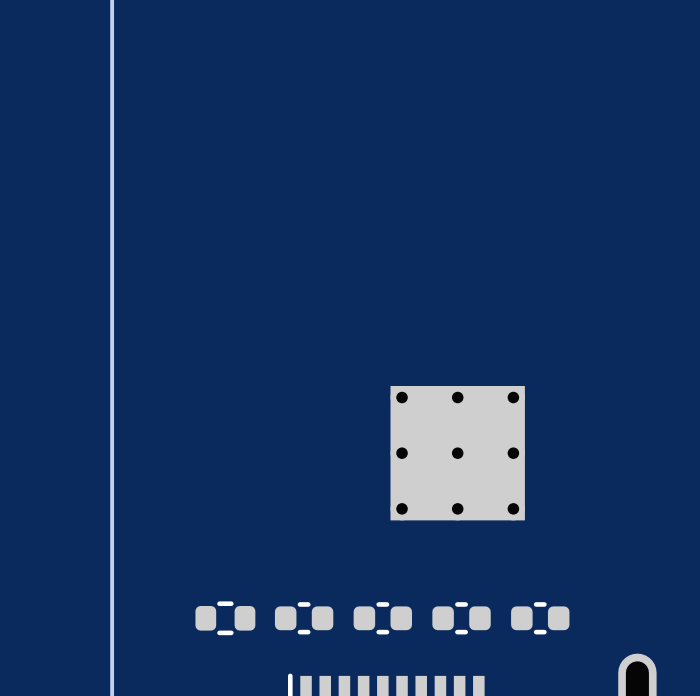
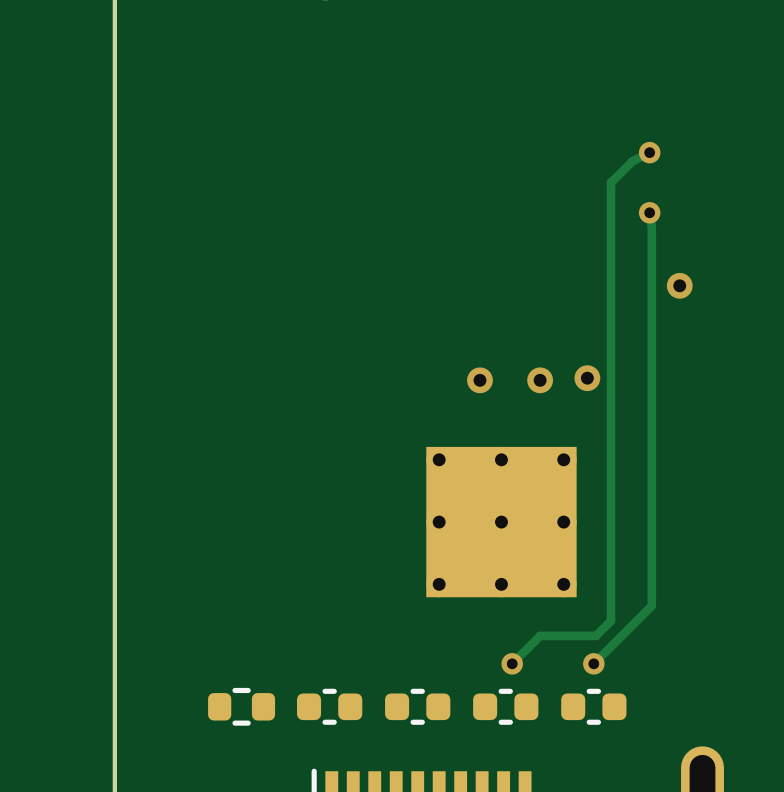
track: none -> (649, 152) (632, 161) (611, 182) (611, 620) (595, 635) (540, 635) (512, 663)
via: none -> (649, 152)
track: none -> (649, 212) (651, 225) (651, 605) (593, 663)
via: none -> (649, 212)
via: none -> (679, 285)
via: none -> (587, 378)
via: none -> (479, 380)
via: none -> (540, 380)
via: none -> (512, 663)
via: none -> (593, 663)

